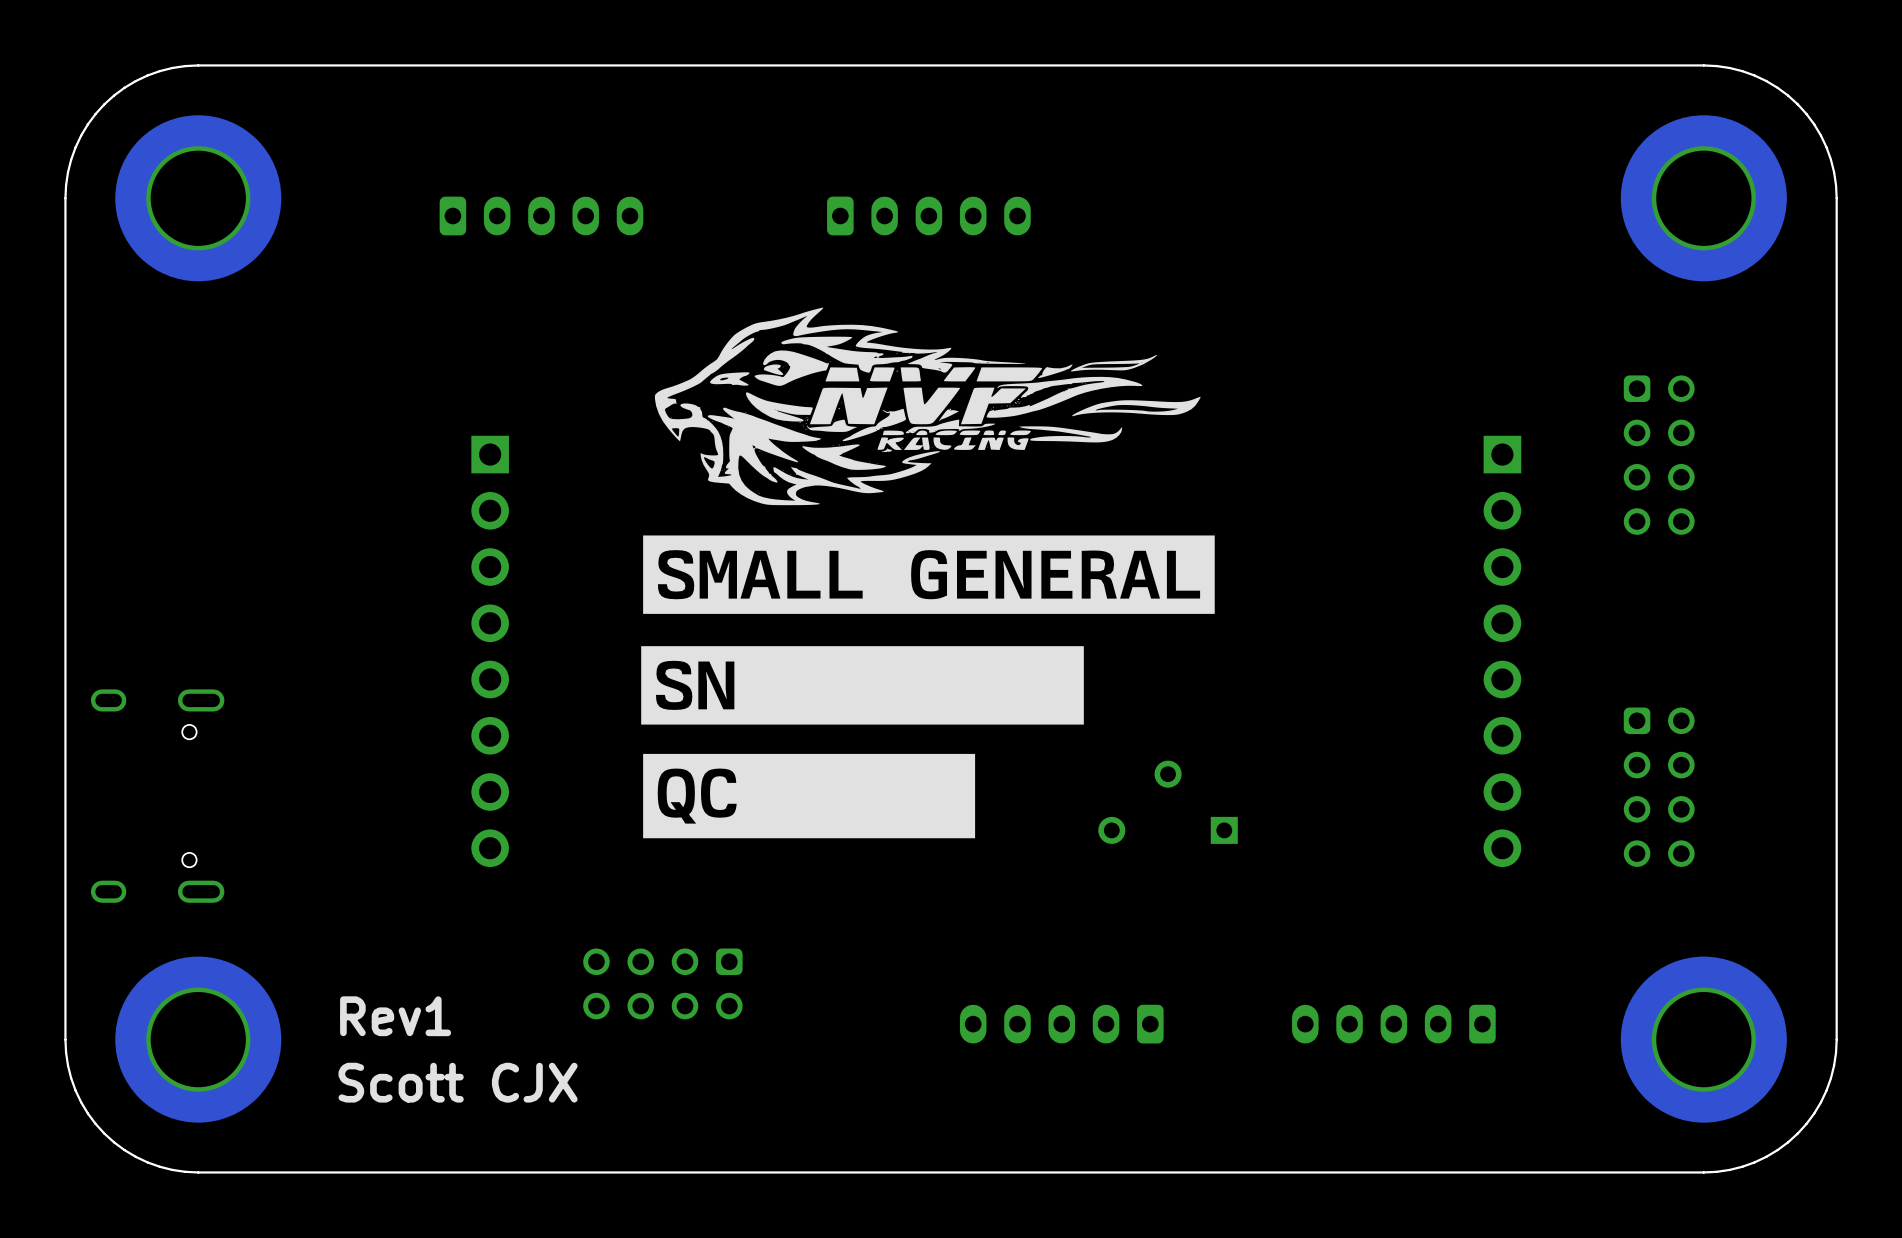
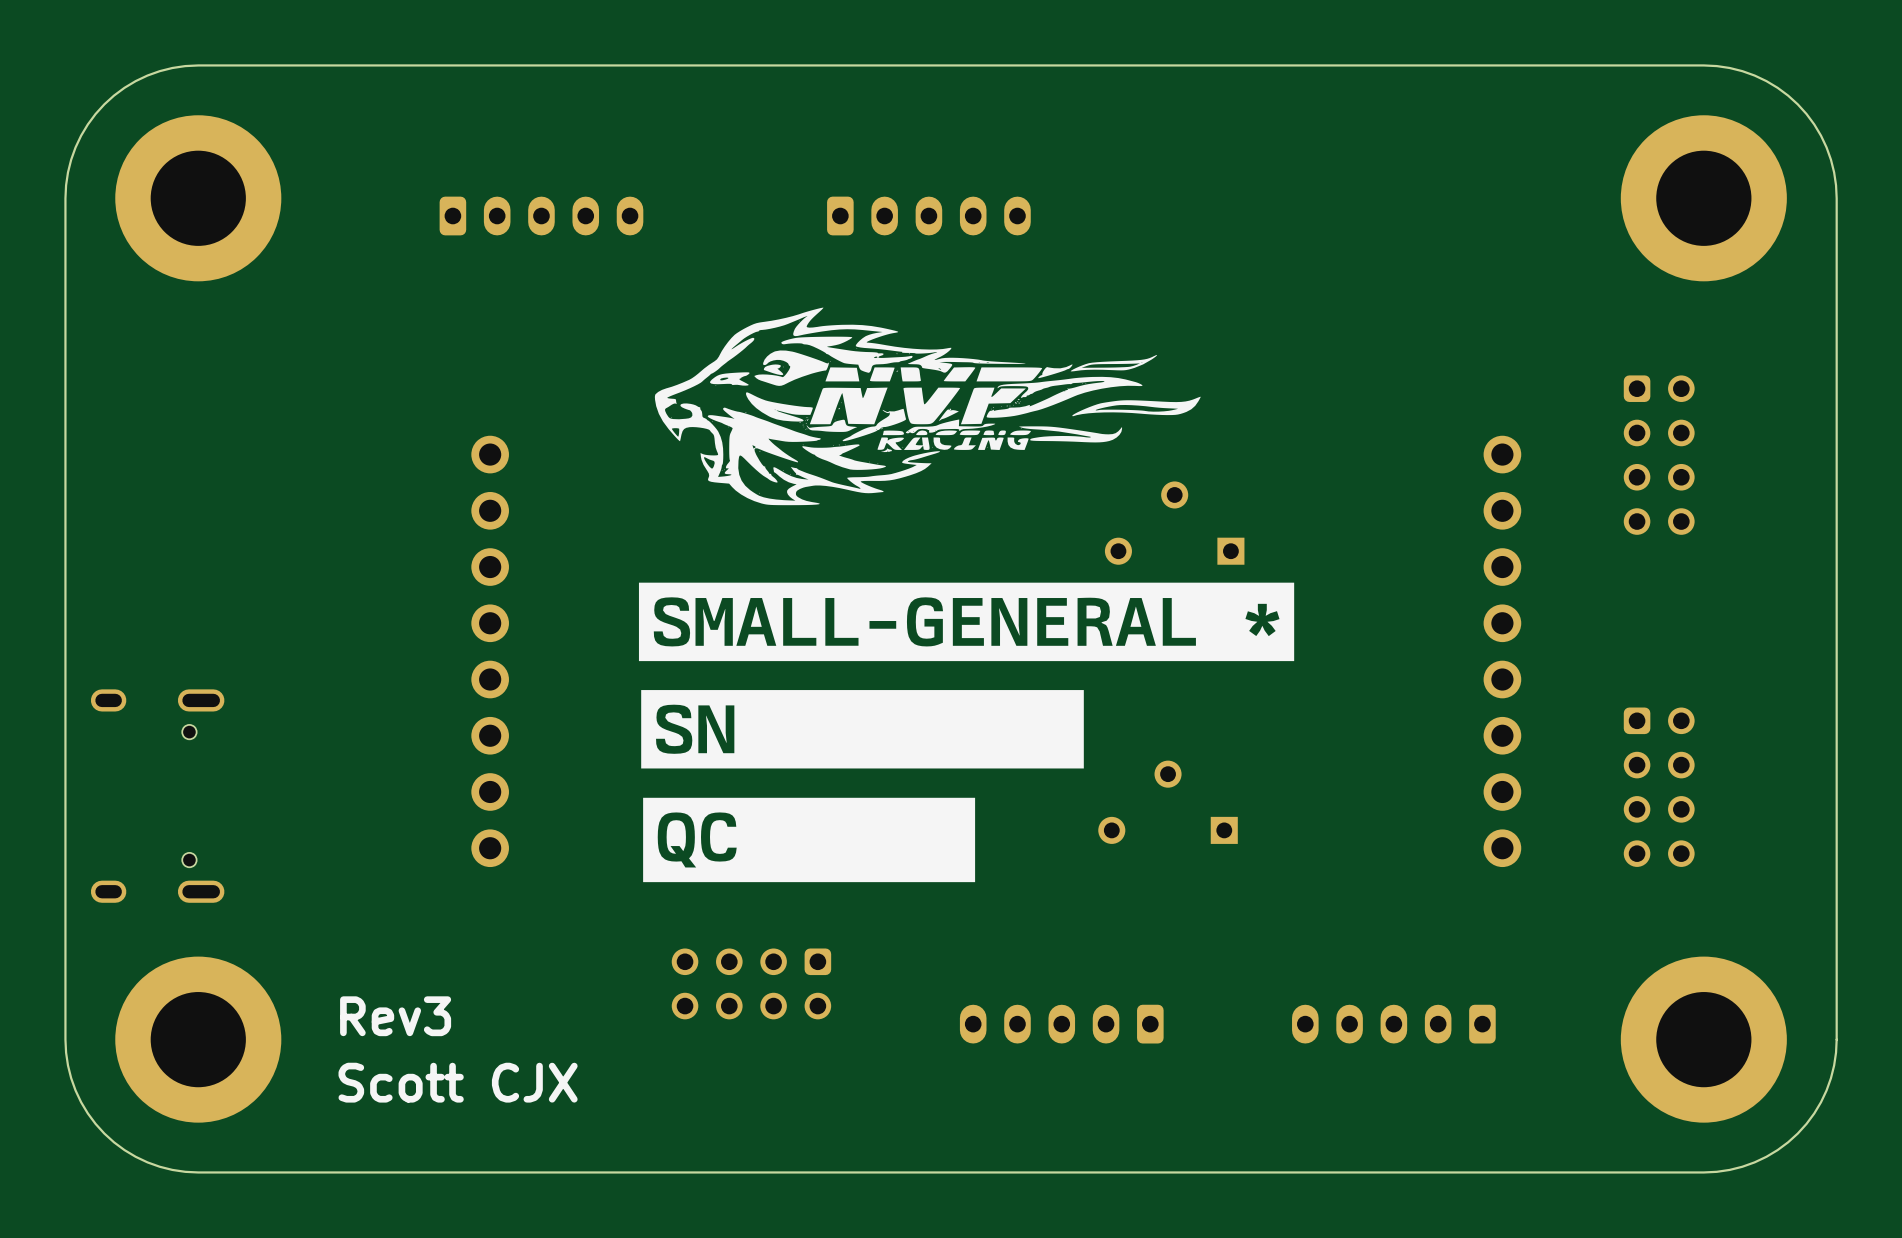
board edge: (1703, 65) (198, 65) (159, 71) (124, 87) (104, 104) (81, 135) (68, 172) (65, 198) (65, 1039) (71, 1078) (87, 1113) (114, 1142) (135, 1156) (172, 1169) (198, 1172) (1703, 1172) (1742, 1166) (1777, 1150) (1806, 1123) (1820, 1102) (1830, 1078) (1836, 1052) (1836, 185) (1830, 159) (1820, 135) (1806, 114) (1788, 95) (1766, 81) (1742, 71) (1703, 65) -> none
part: none -> (1174, 523)
drawing: [643, 535, 1215, 614] -> none
drawing: none -> [638, 582, 1295, 662]
part: none -> (951, 618)
part: (490, 651) -> none
part: (1502, 651) -> none
drawing position: (862, 685) -> (862, 729)
drawing position: (809, 796) -> (809, 839)
part: (662, 983) -> none
text: Rev1 (395, 1016) -> Rev3 (395, 1016)

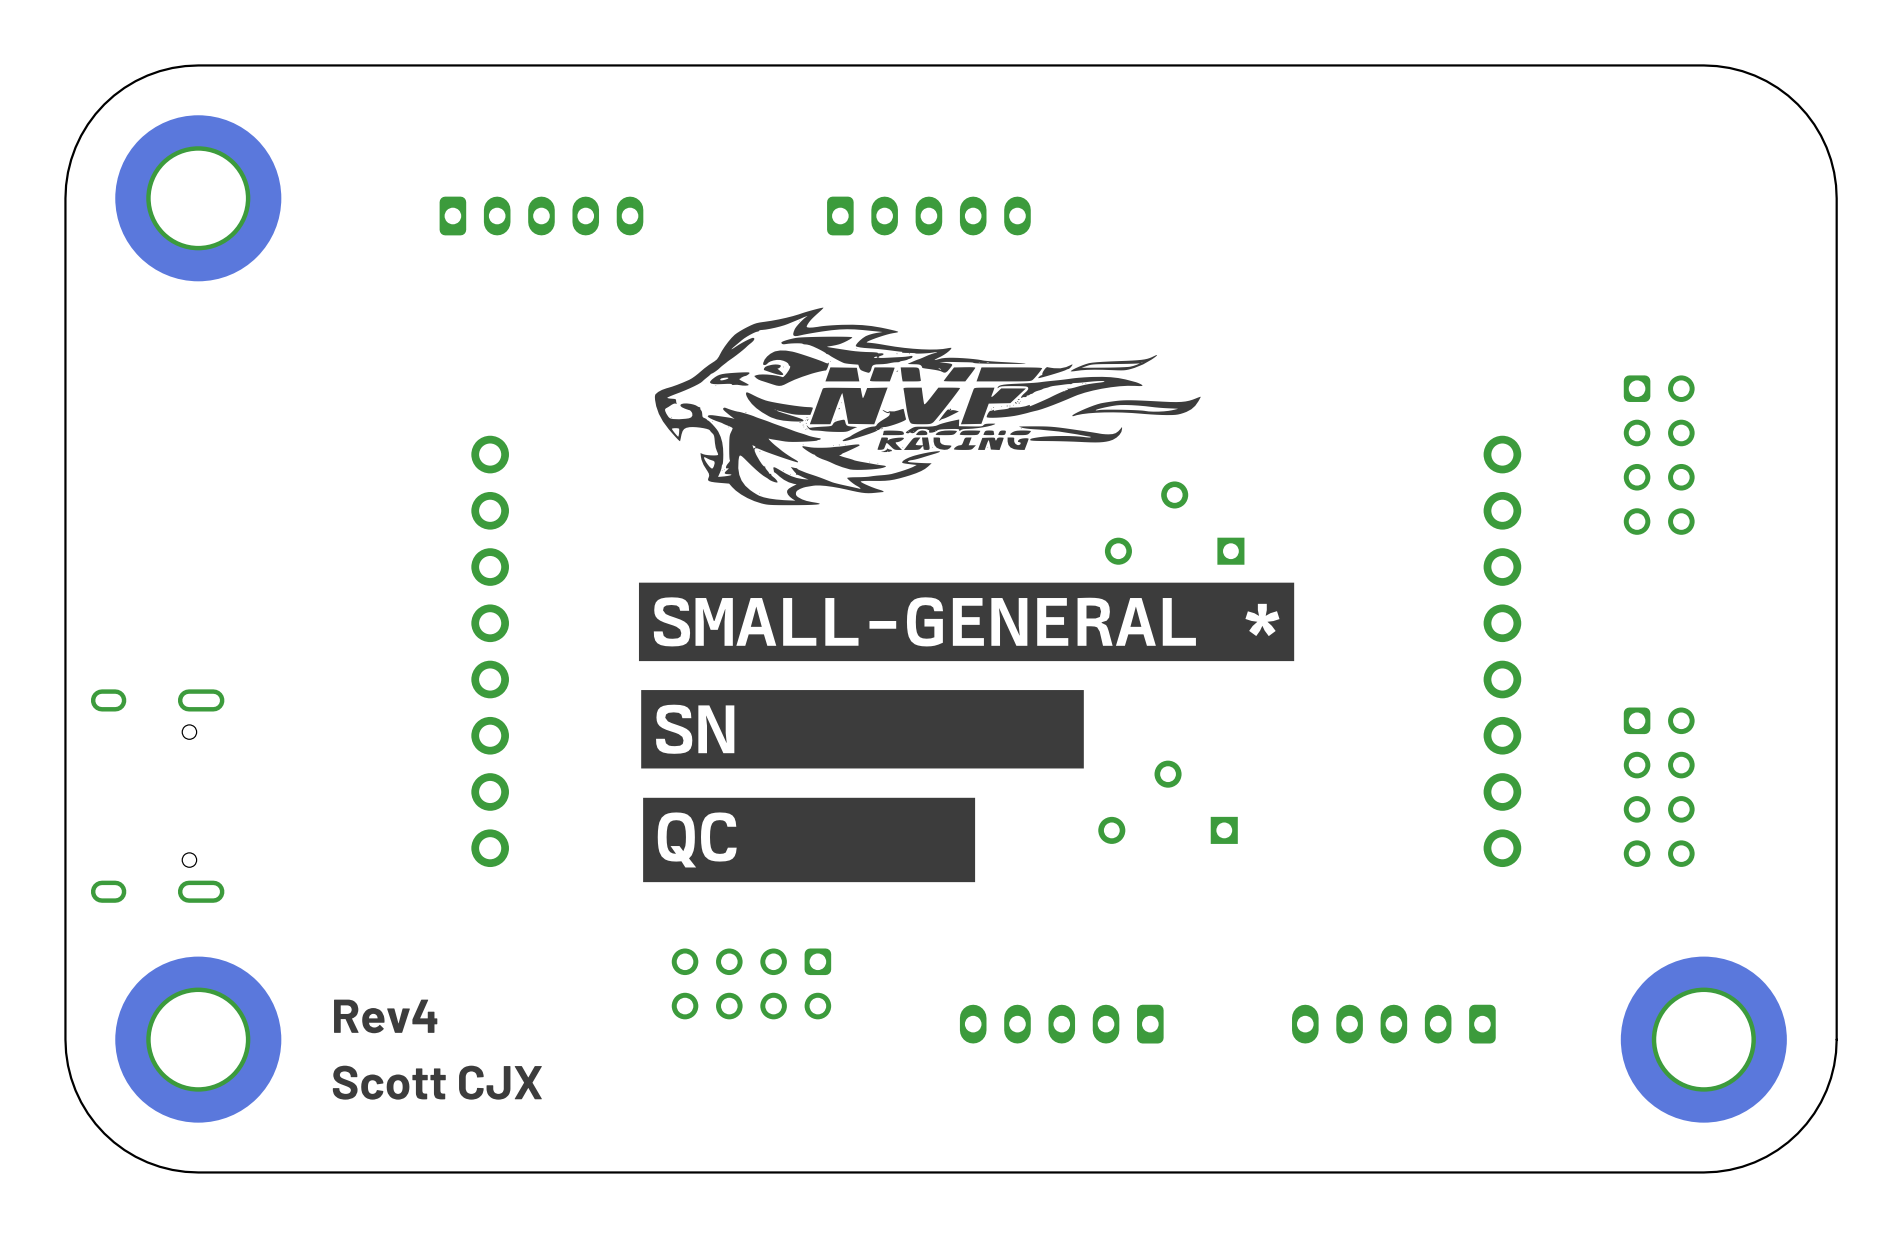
part footprint: [64, 64, 1838, 1174] -> [64, 64, 1838, 1174]
text: Rev3 (395, 1016) -> Rev4 (385, 1016)

